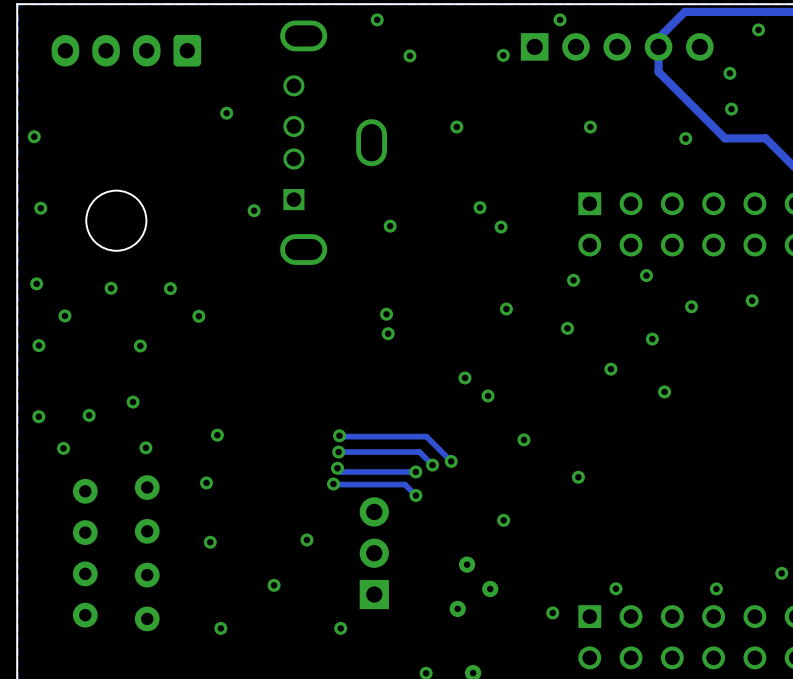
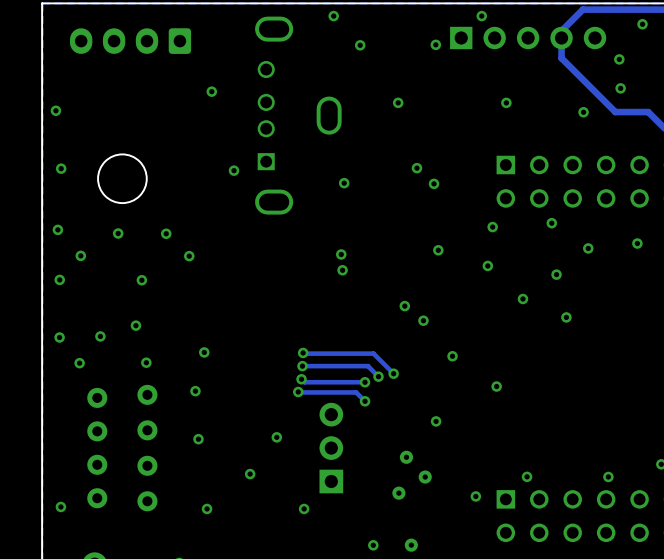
via: none -> (60, 506)

